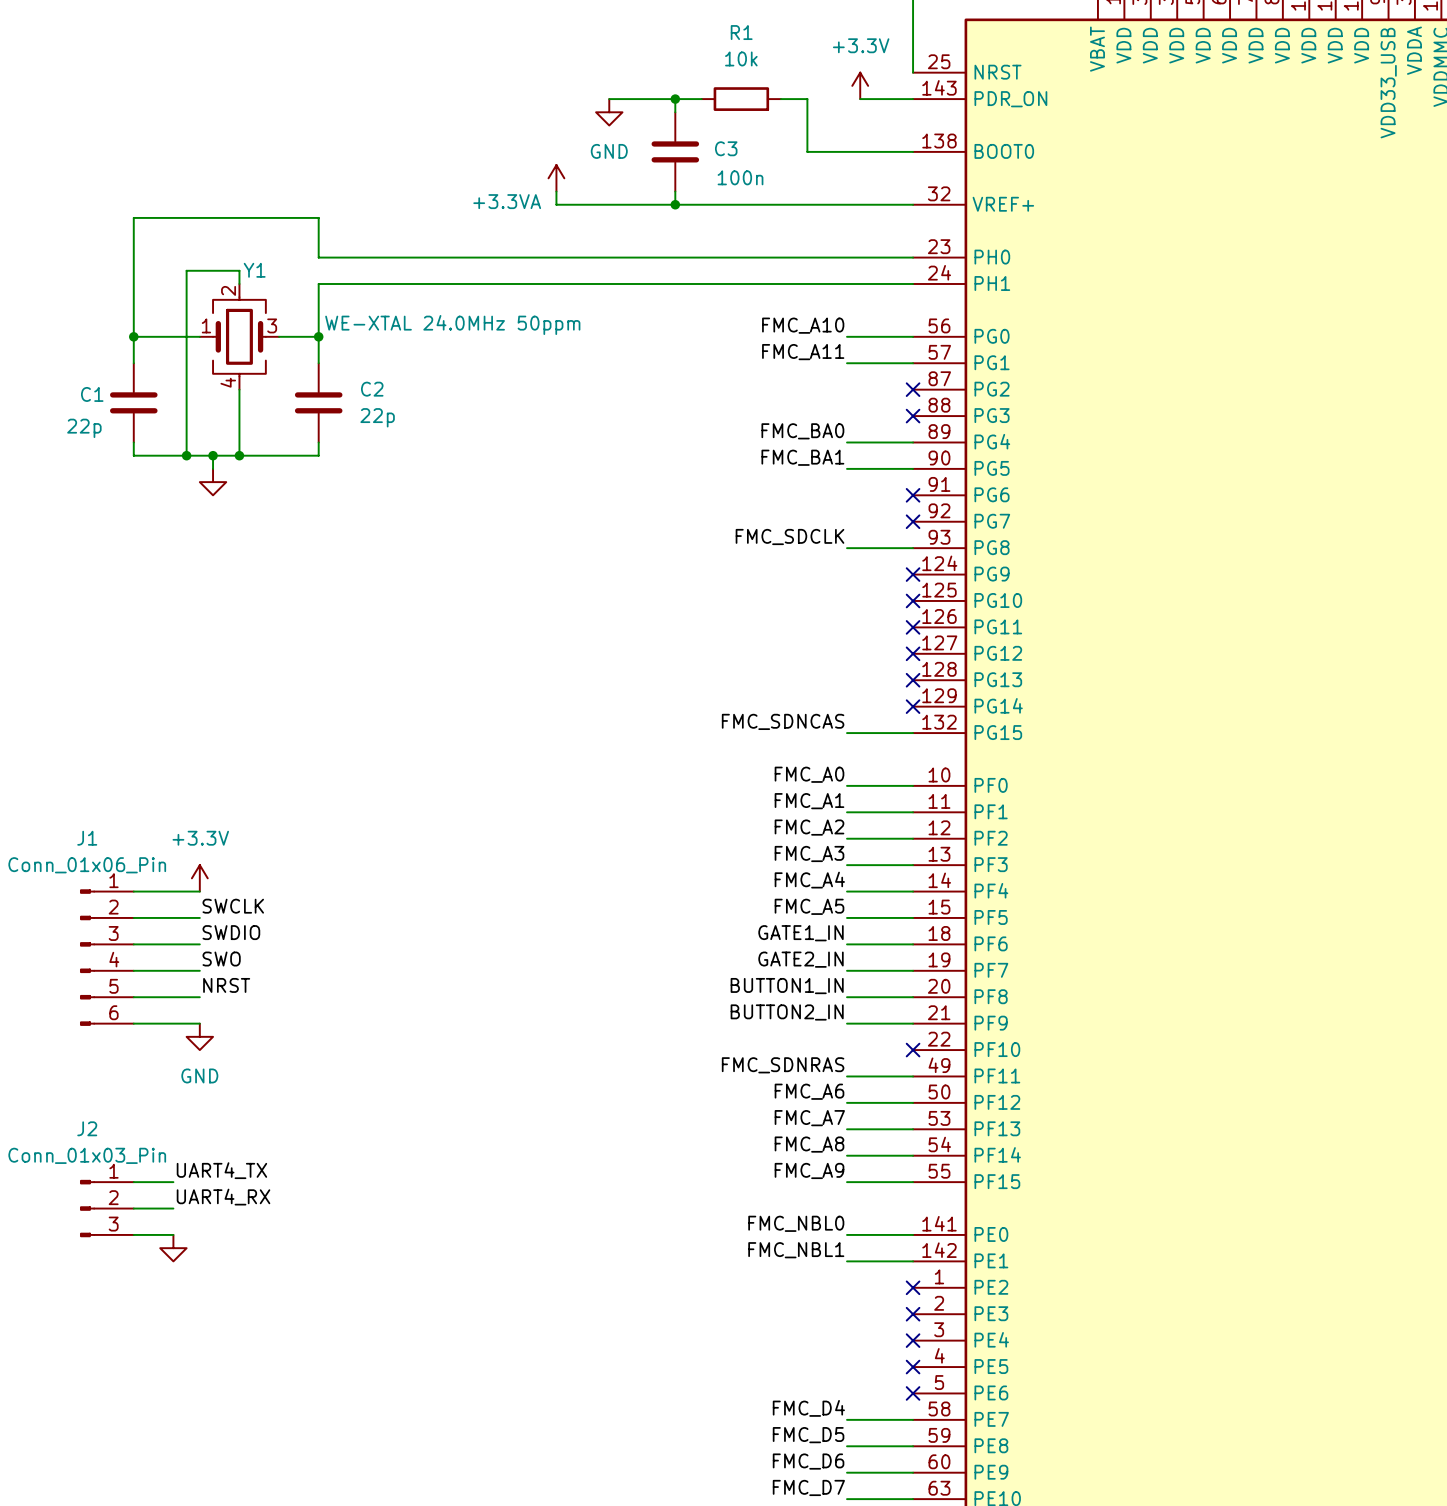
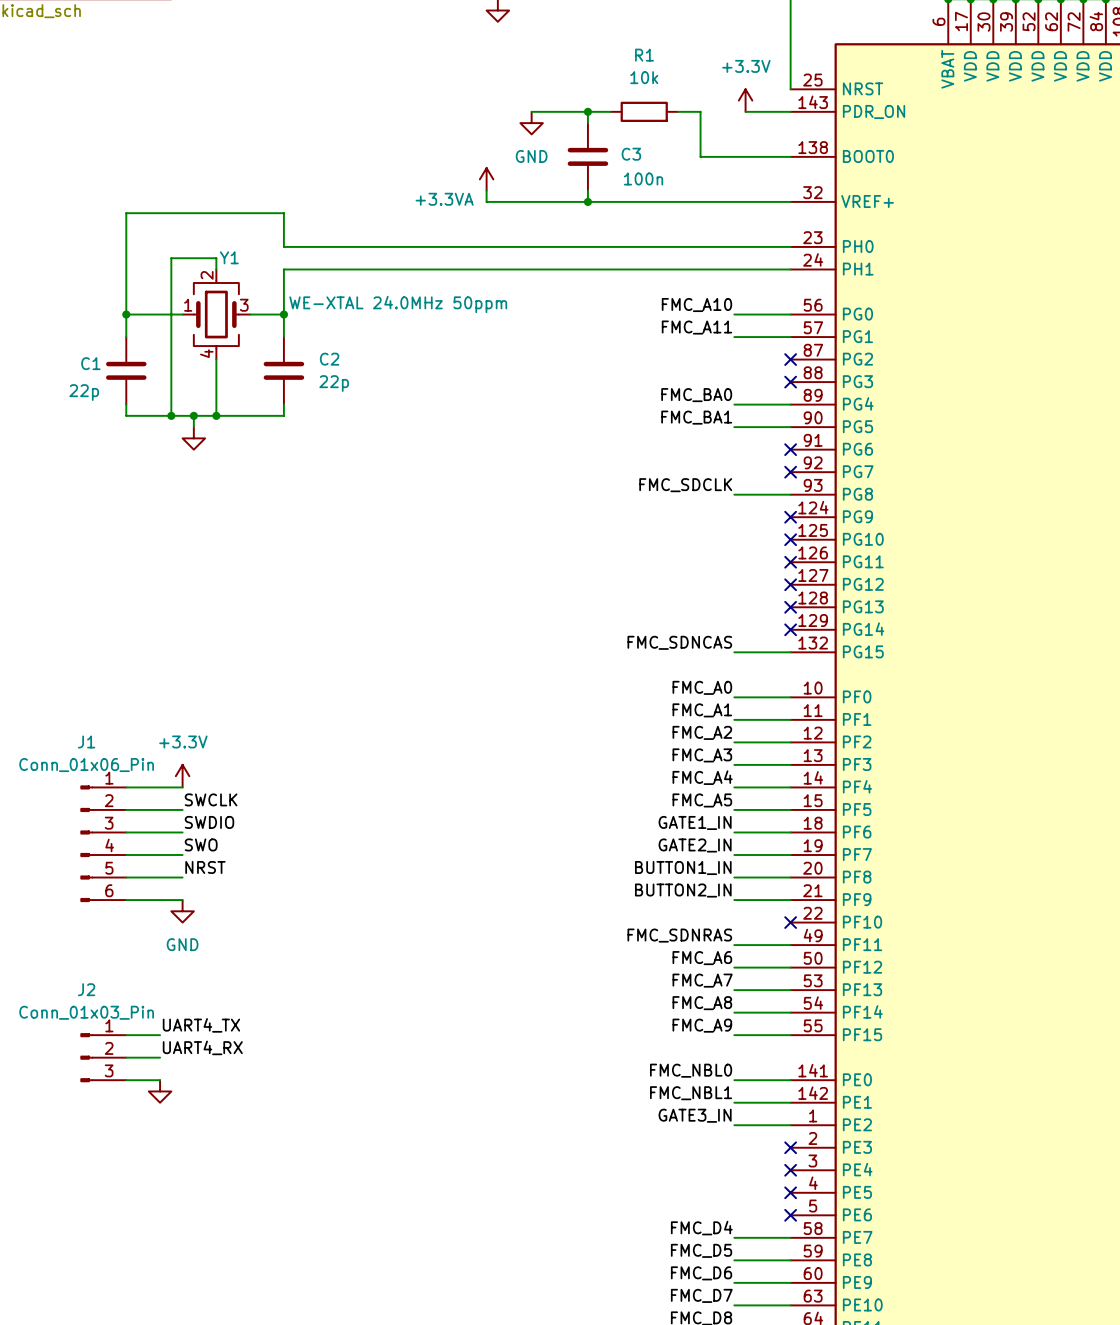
label: none -> GATE3_IN (695, 1115)
wire: none -> (734, 1125) (790, 1125)
no-connect mark: (913, 1287) -> none

